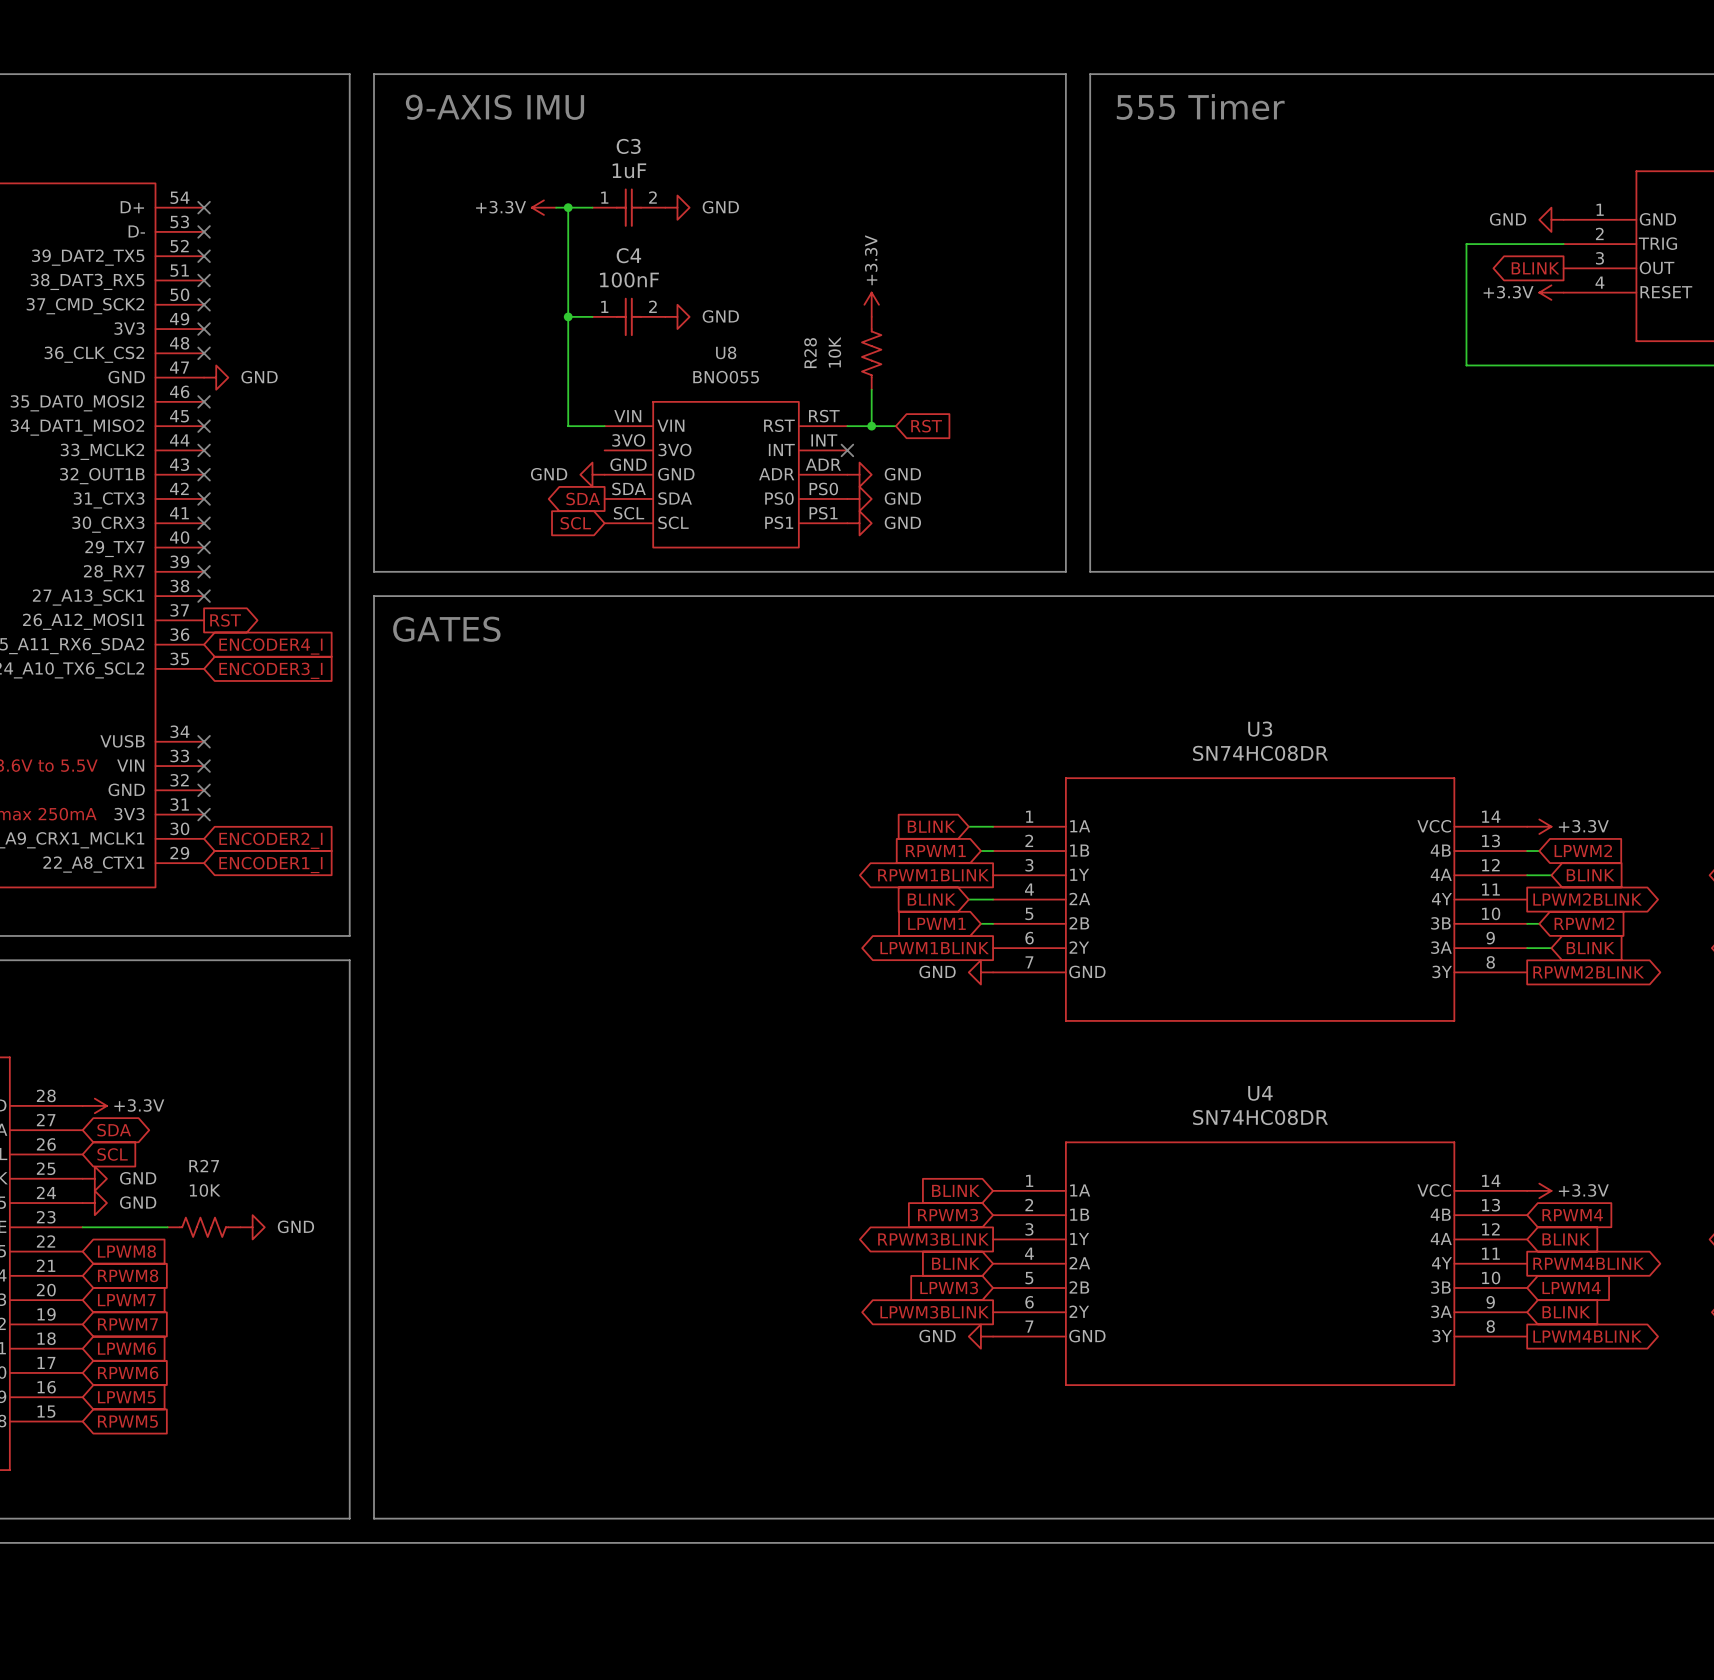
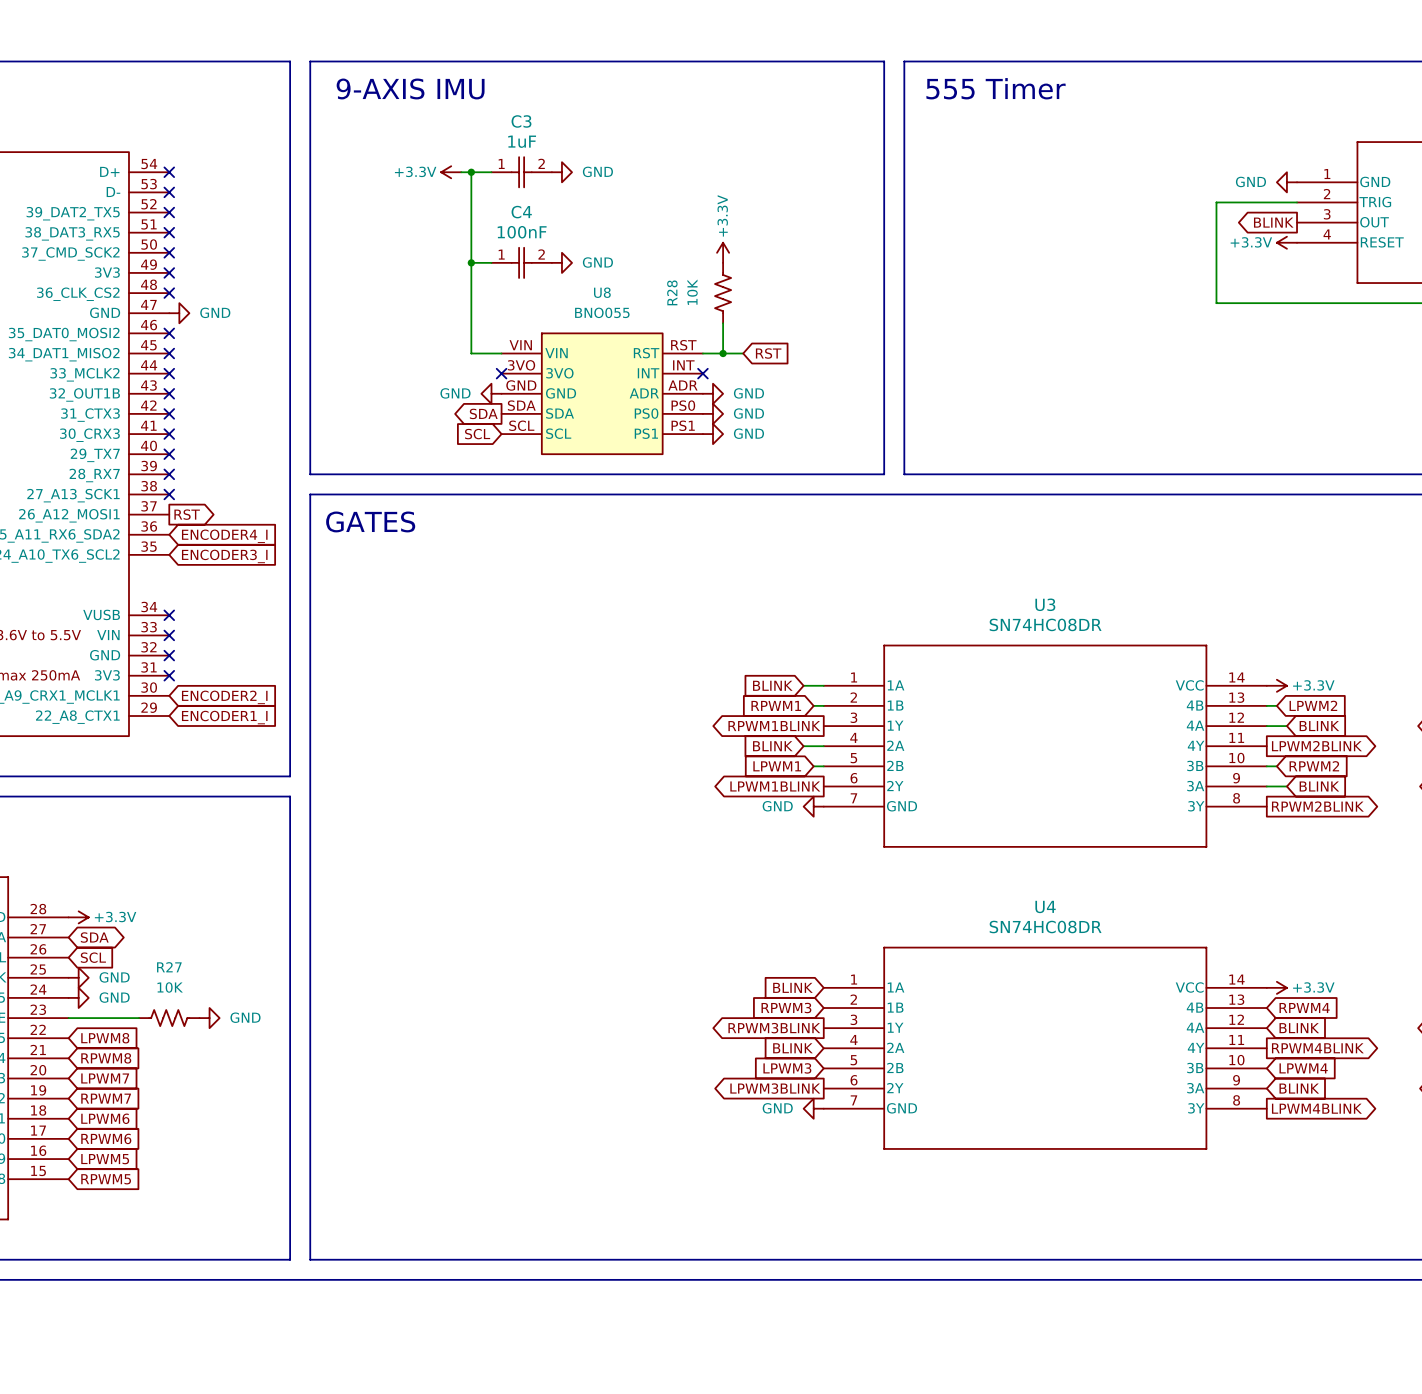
no-connect mark: none -> (501, 373)

